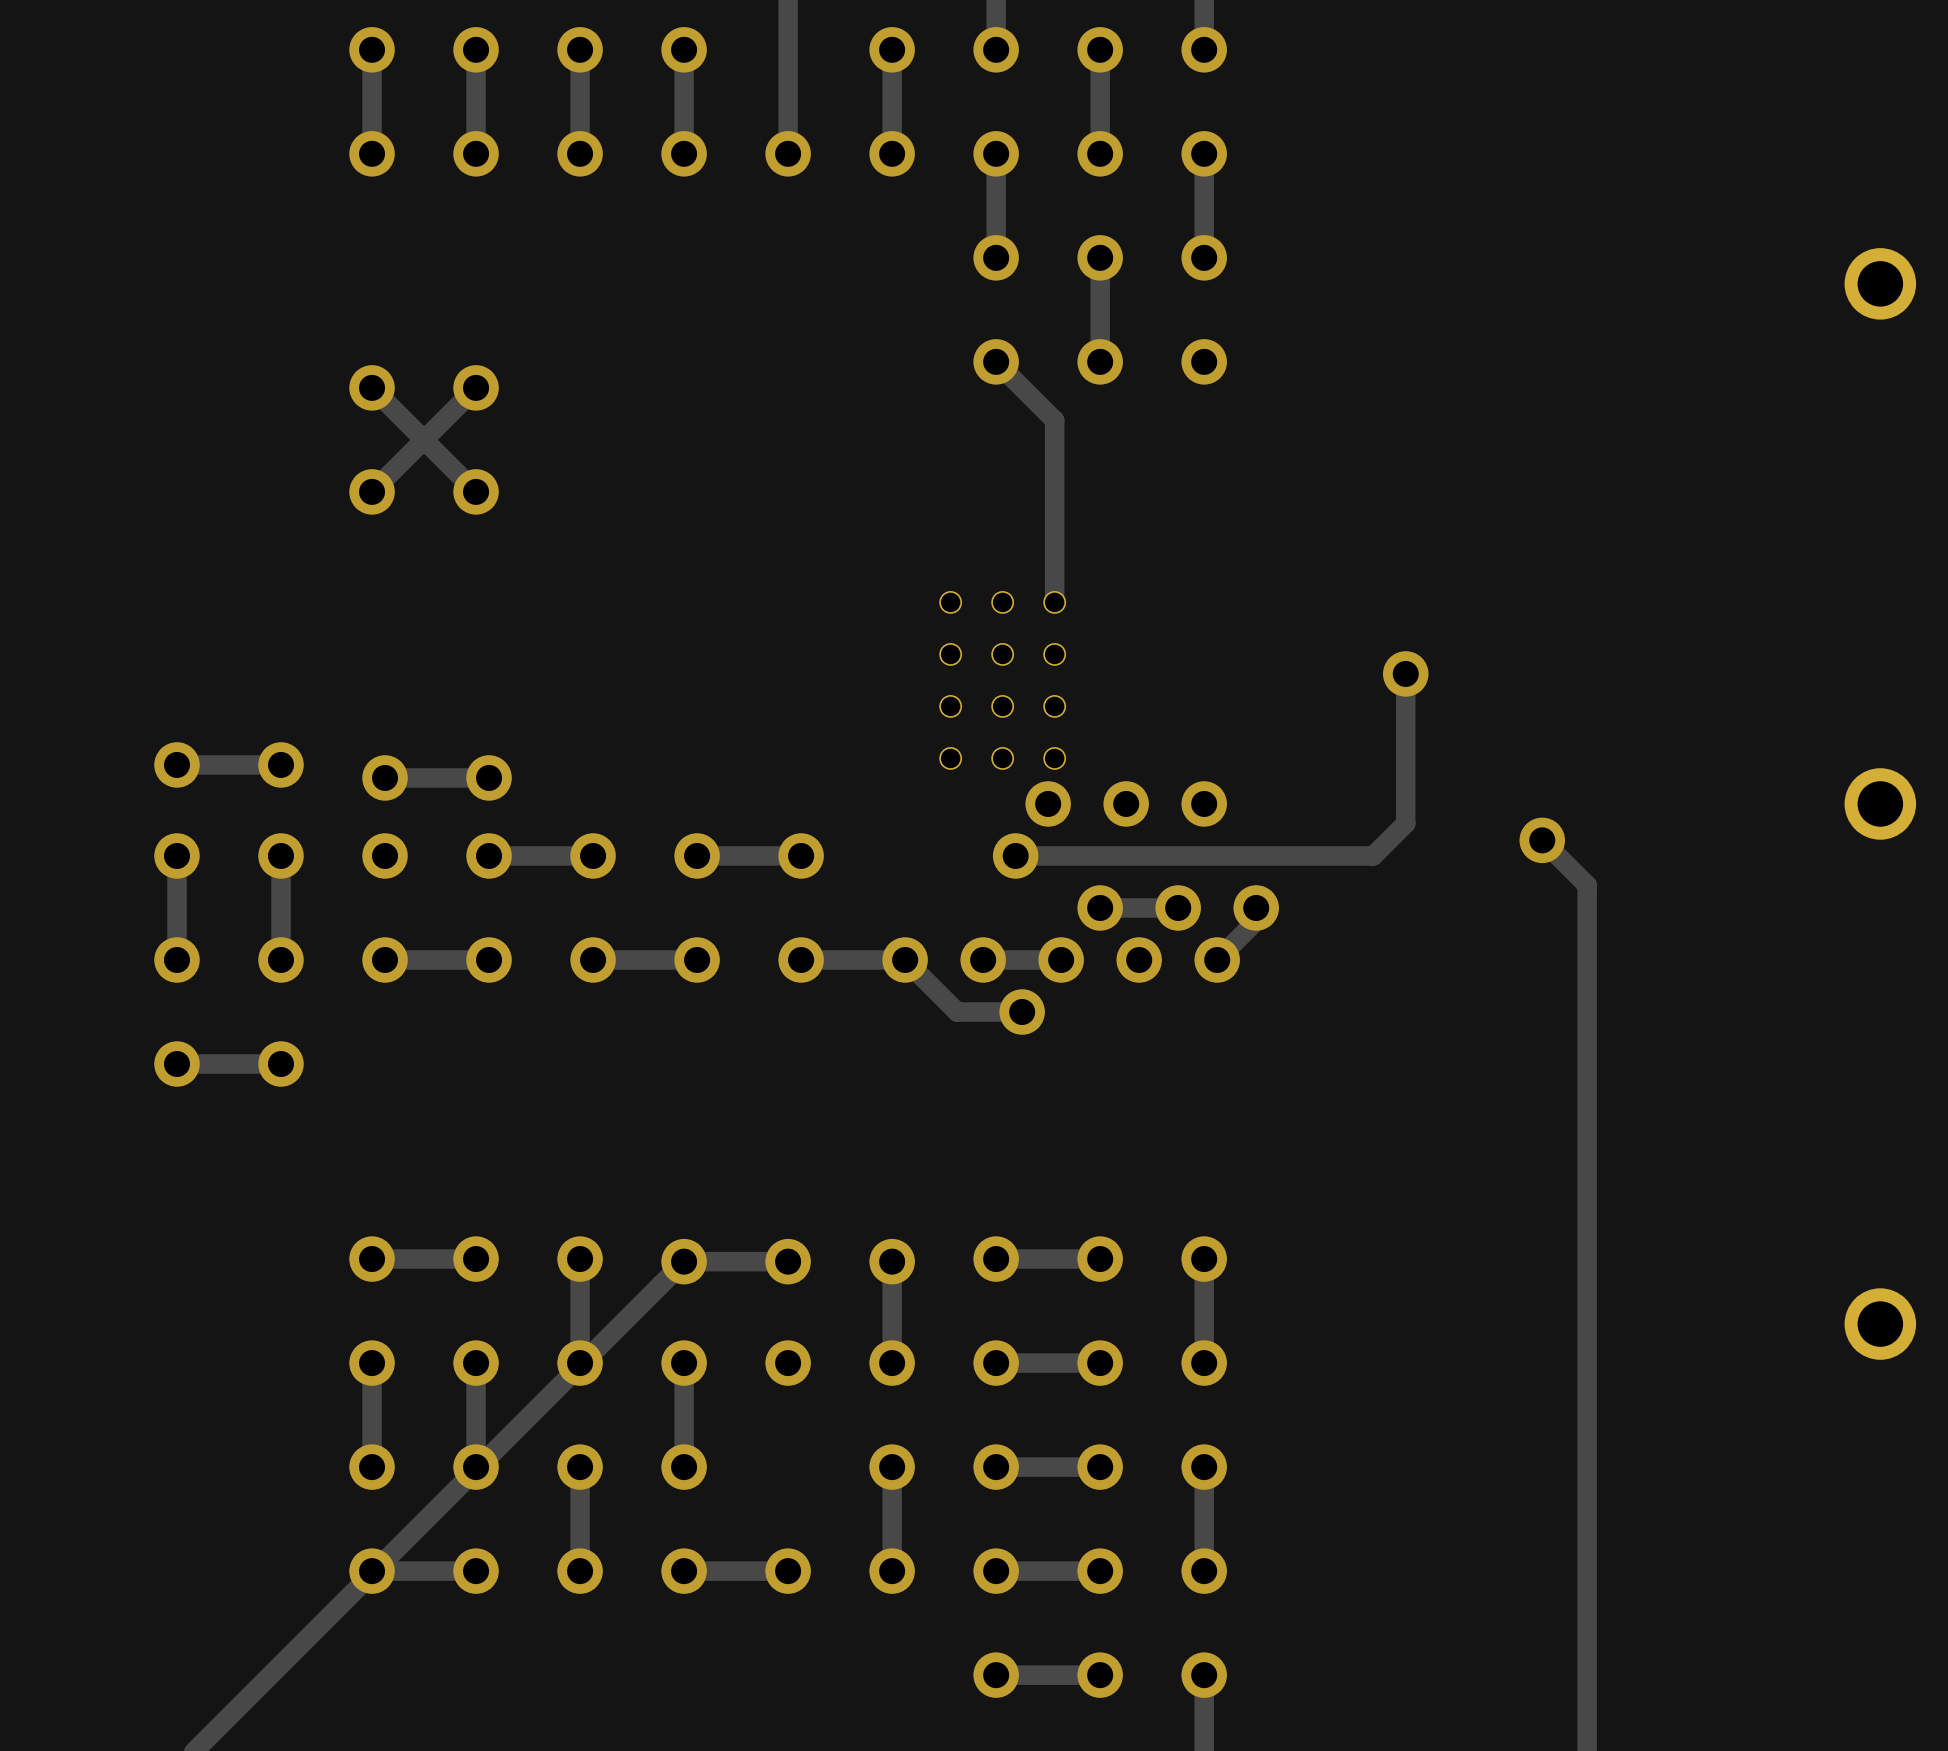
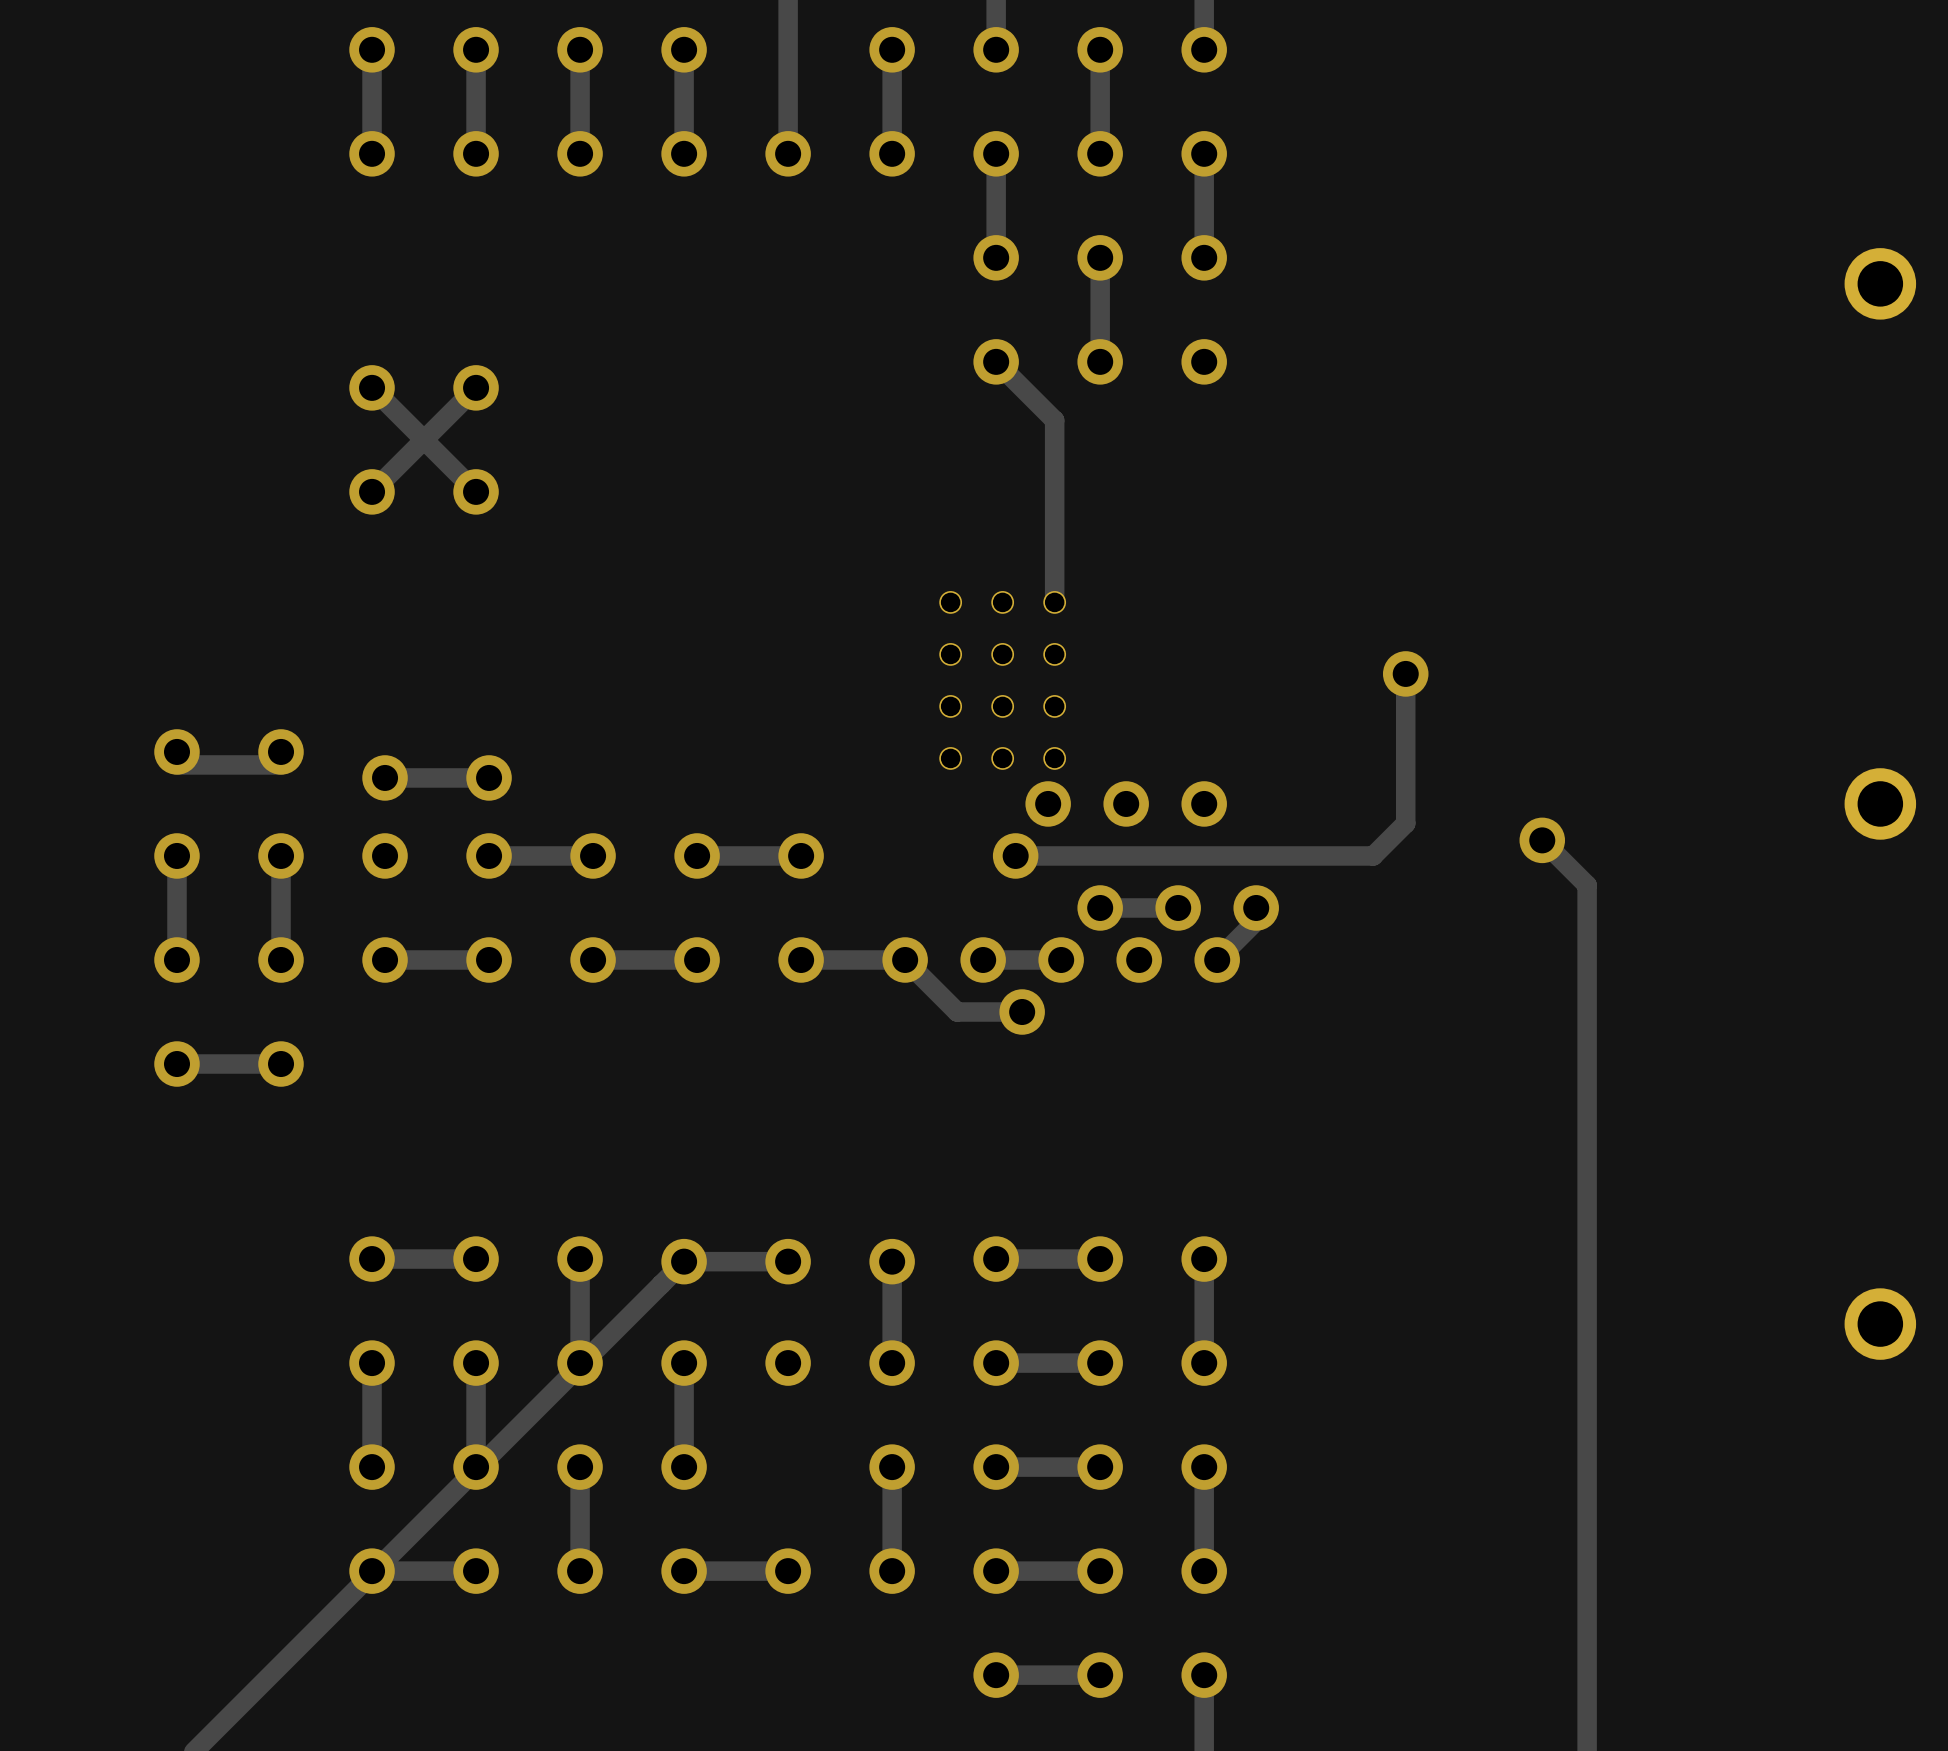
via position: (176, 764) -> (176, 751)
via position: (281, 764) -> (281, 751)

